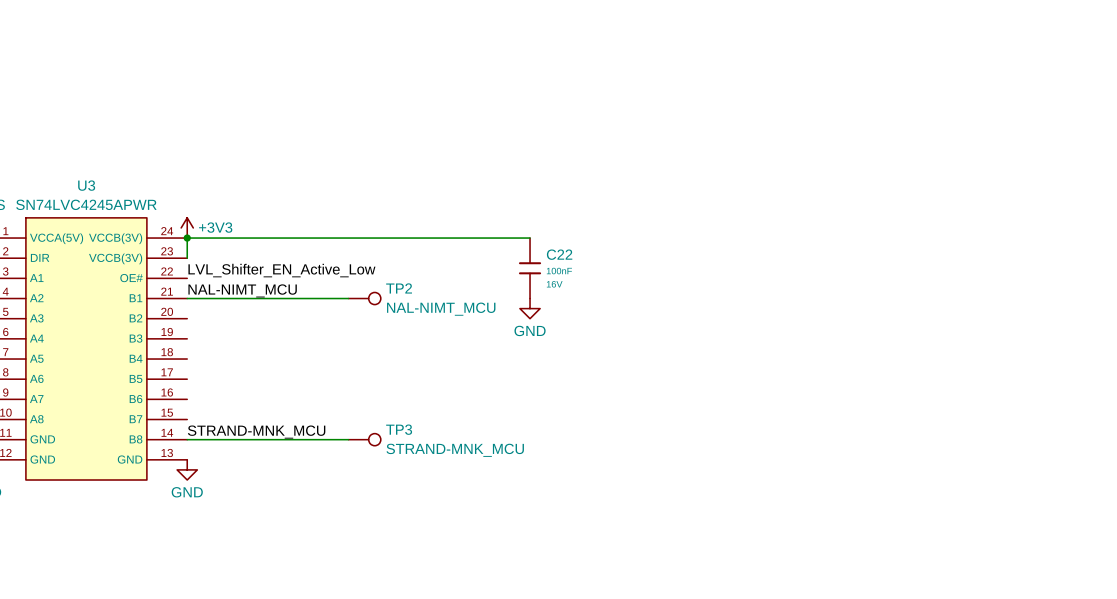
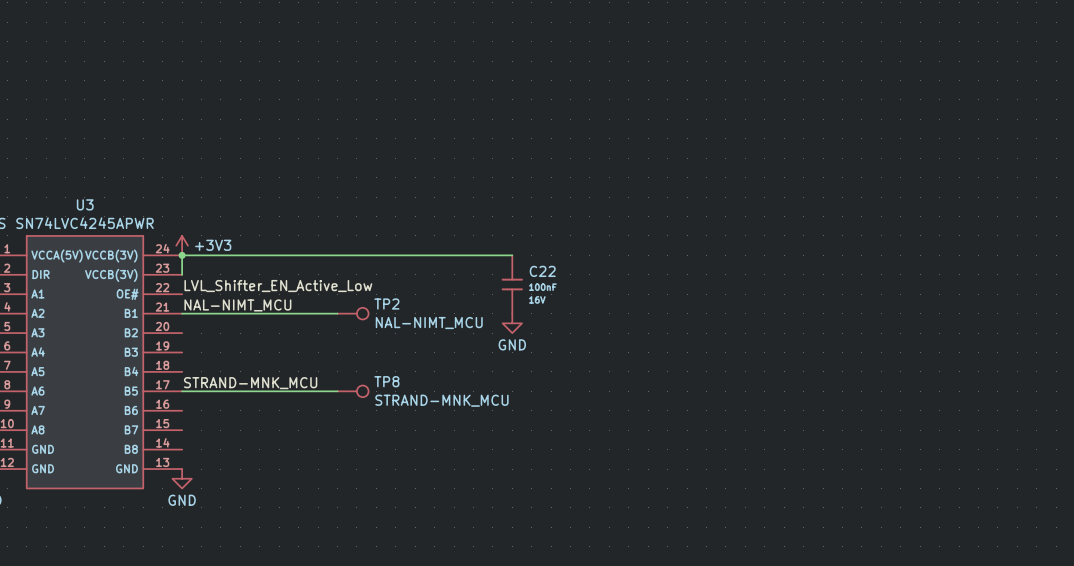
TP8: none -> STRAND-MNK_MCU (353, 391)
label position: STRAND-MNK_MCU (256, 432) -> STRAND-MNK_MCU (250, 383)
wire: (187, 439) (348, 439) -> (182, 391) (337, 391)
TP3: STRAND-MNK_MCU (364, 439) -> none

